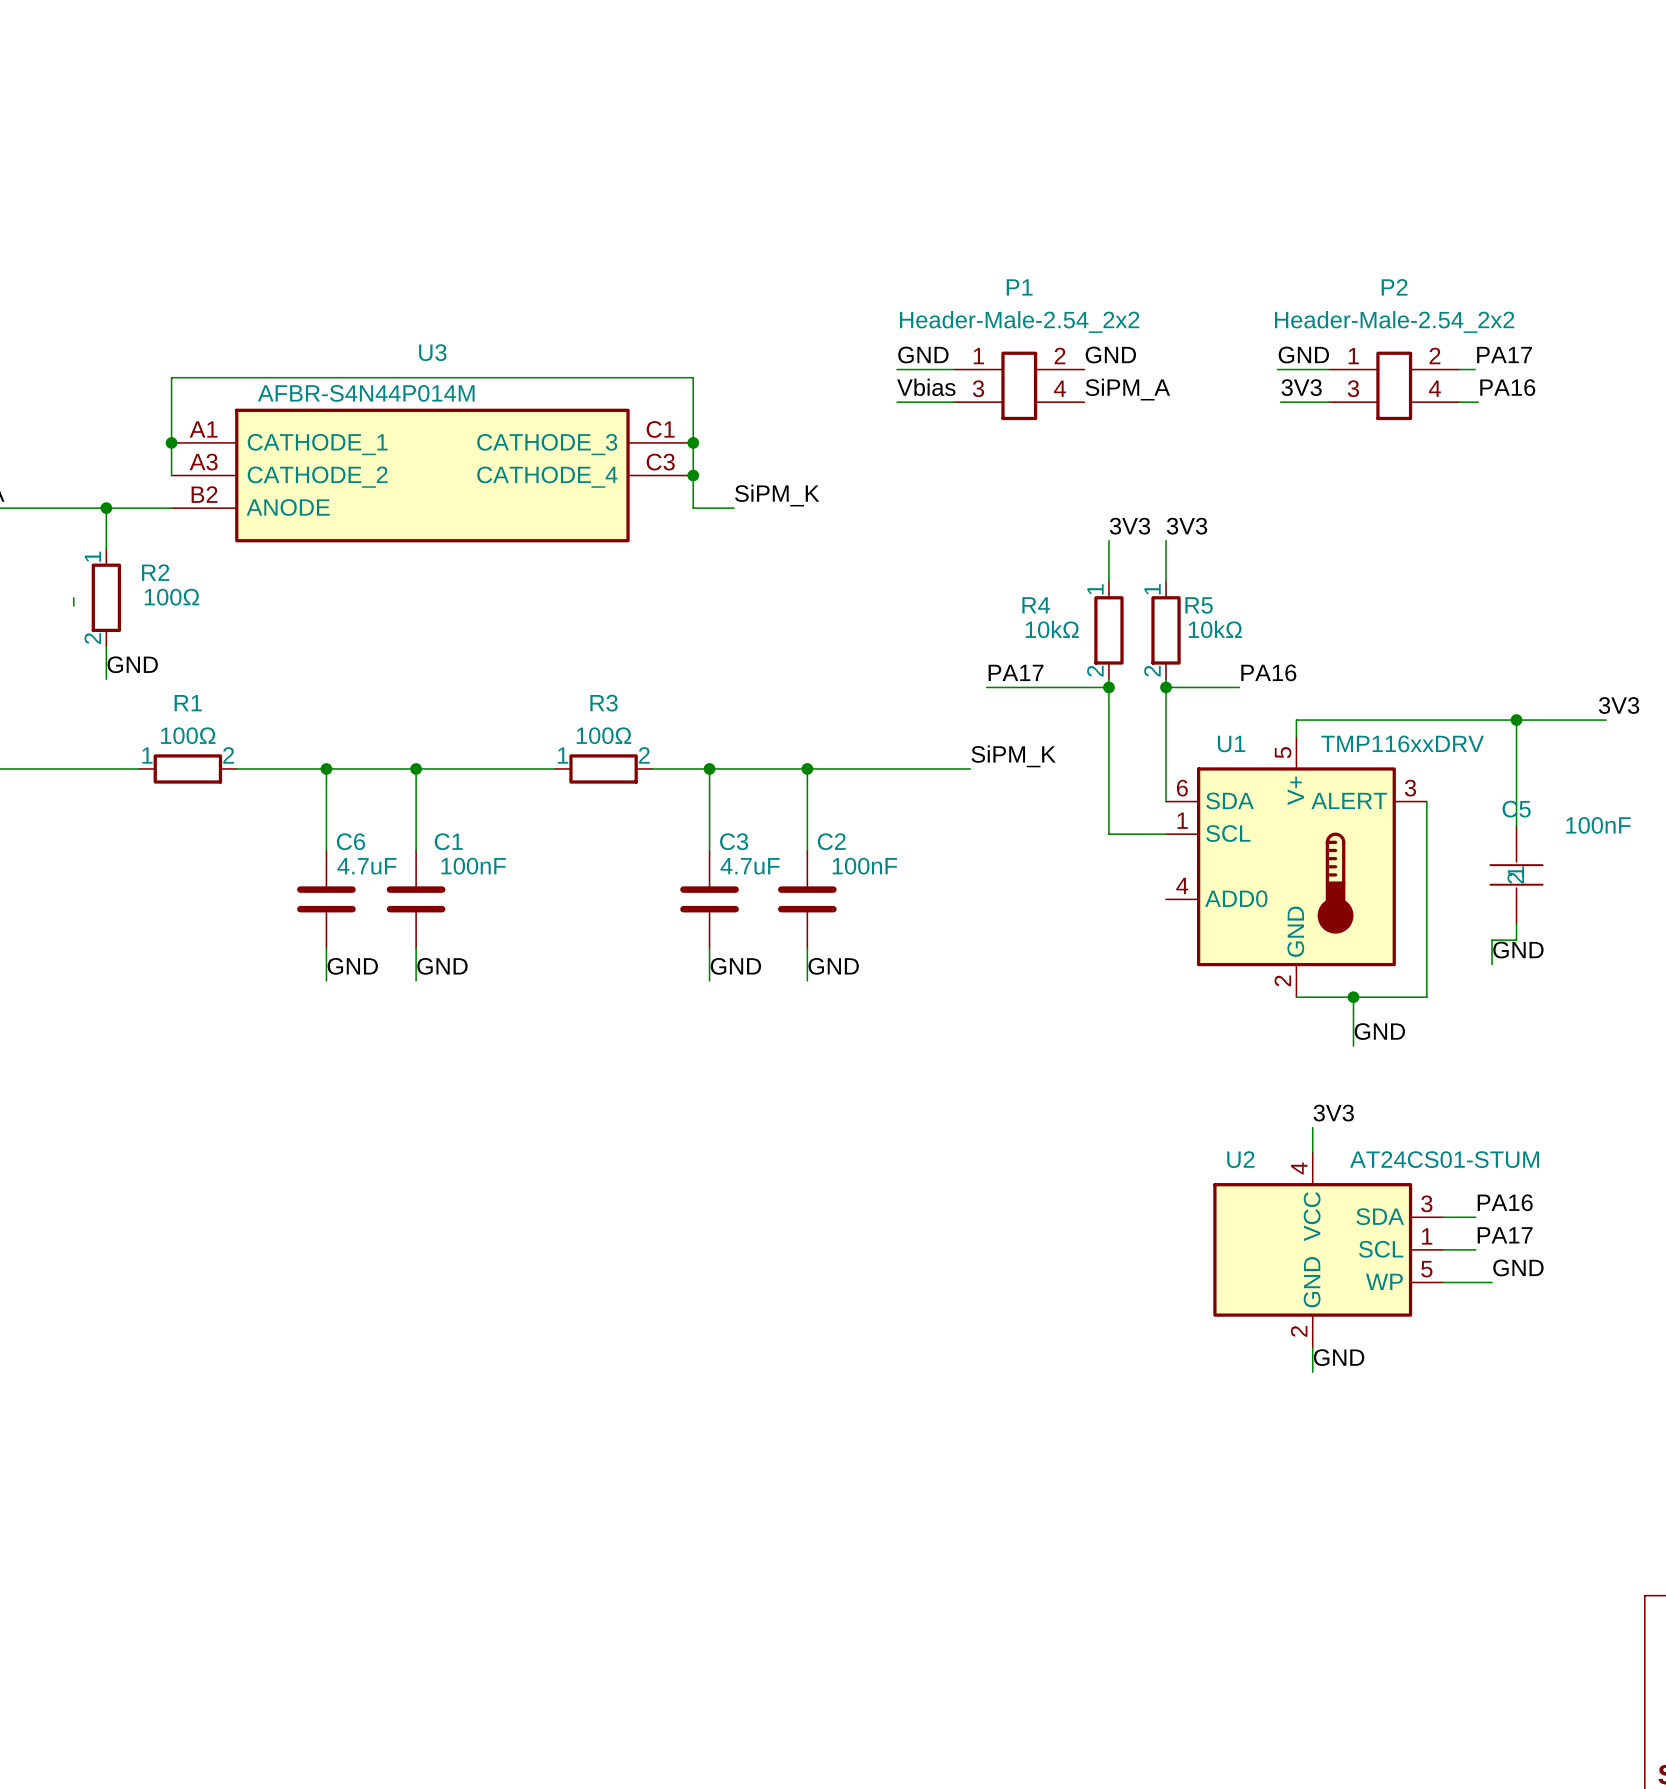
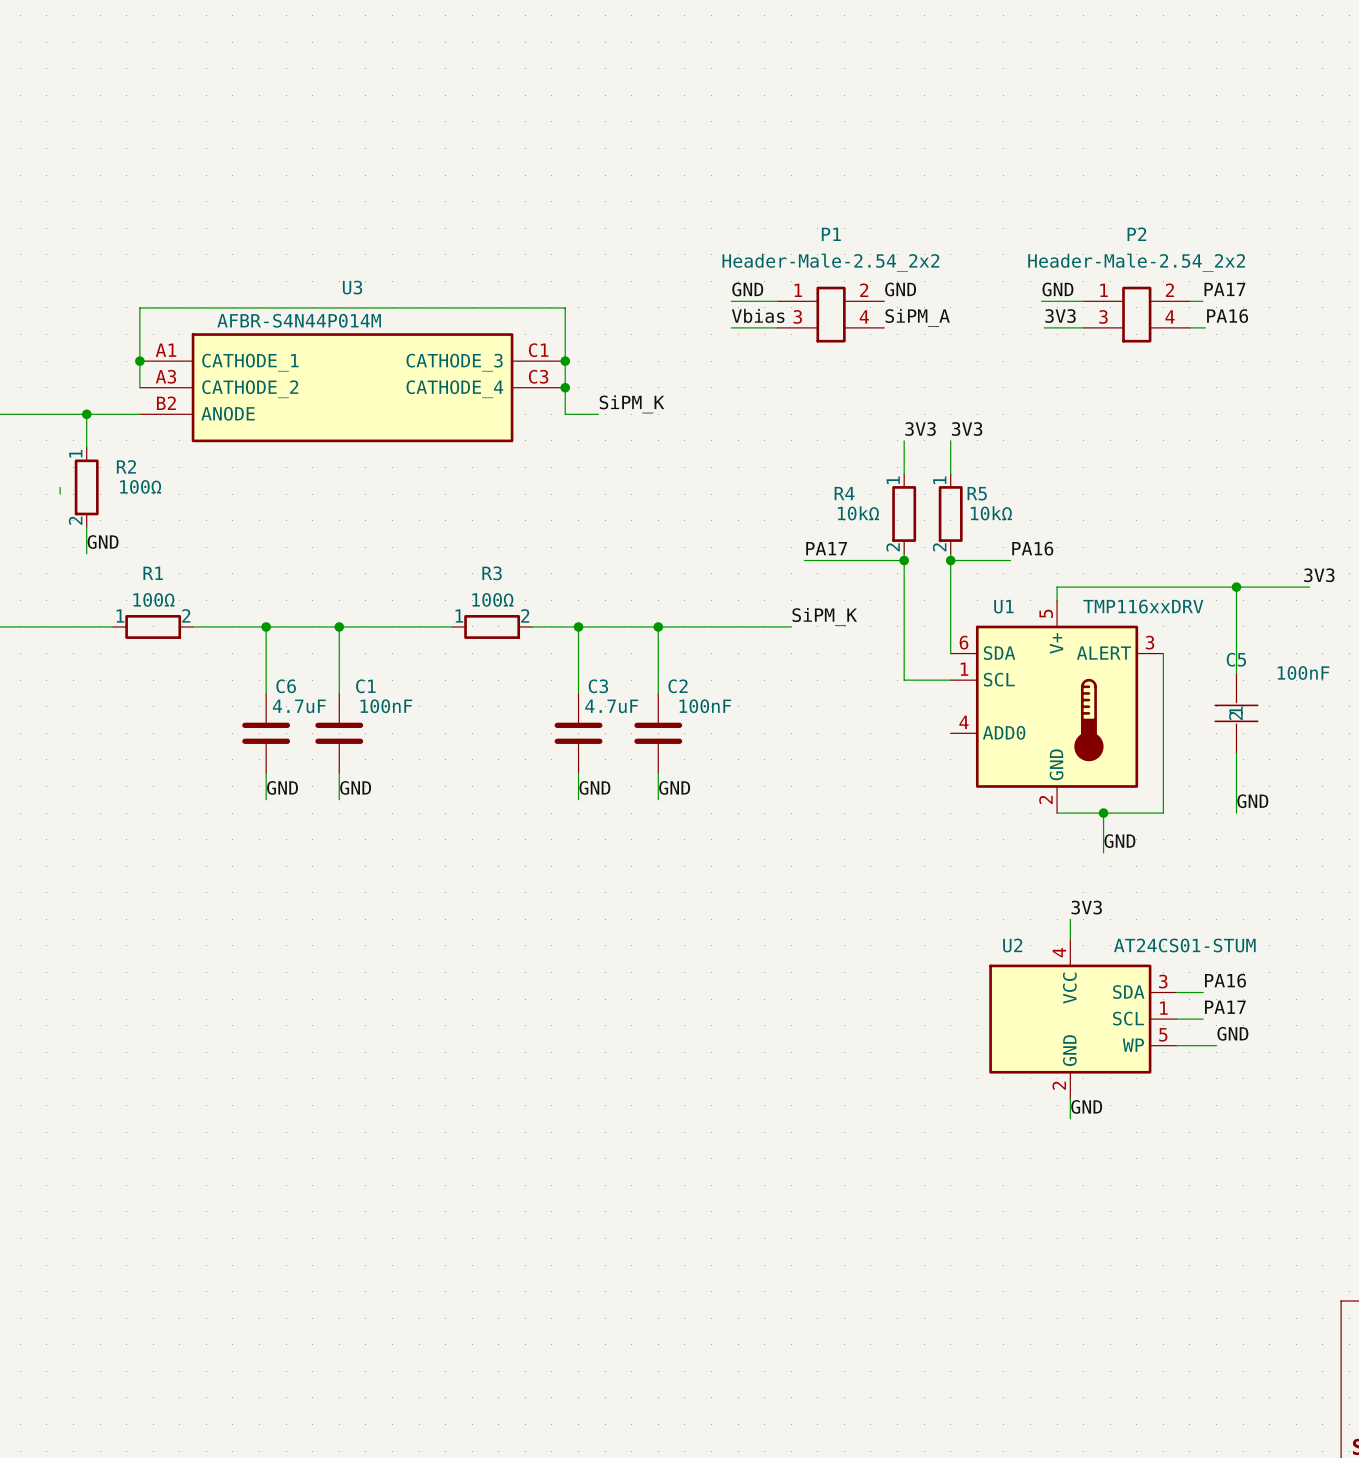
wire: (1516, 940) (1492, 940) (1492, 964) -> (1236, 766) (1236, 813)
label position: GND (1518, 950) -> GND (1252, 801)

